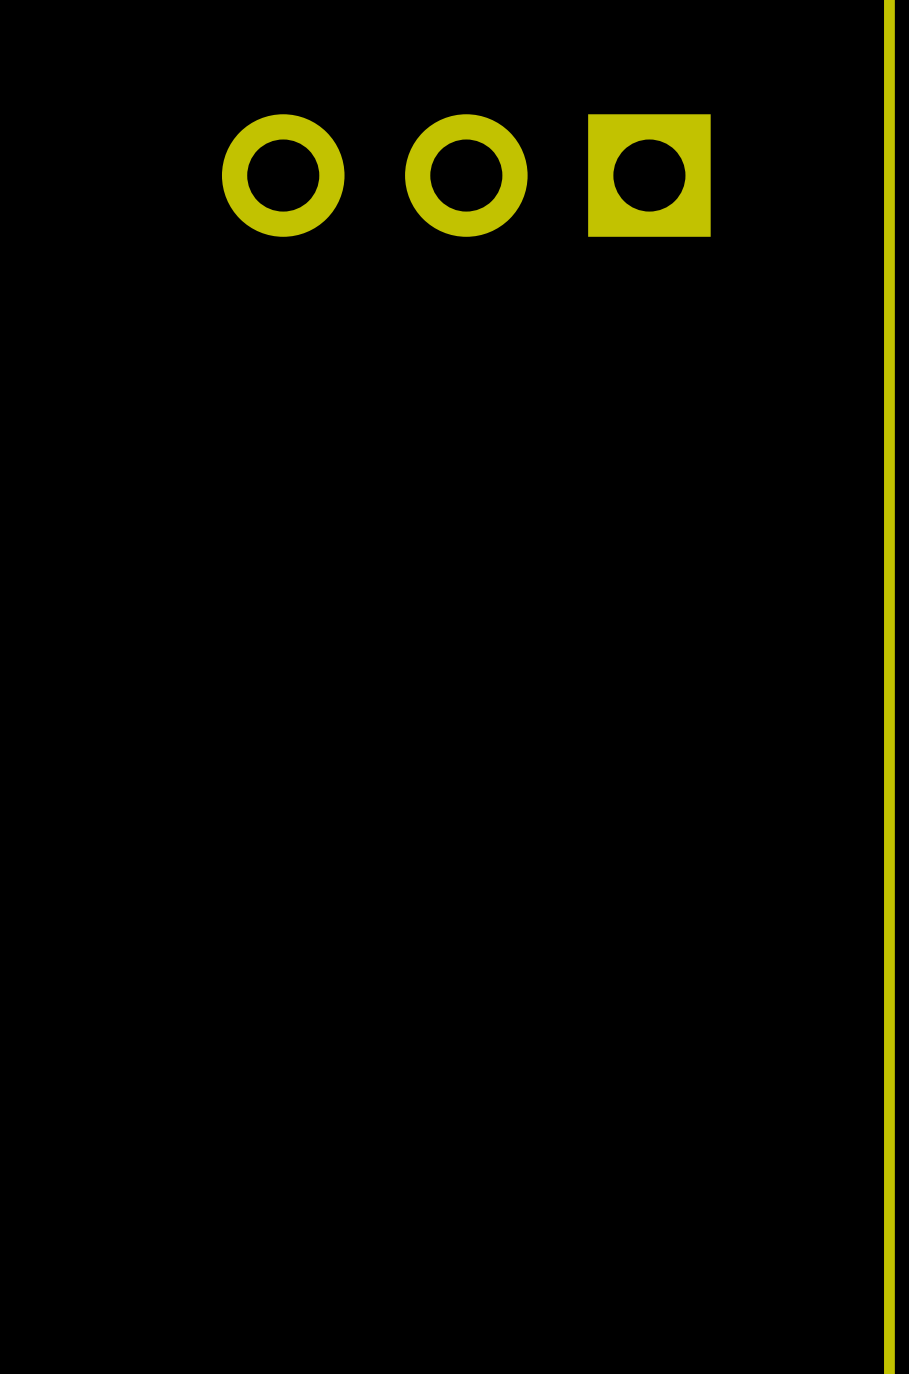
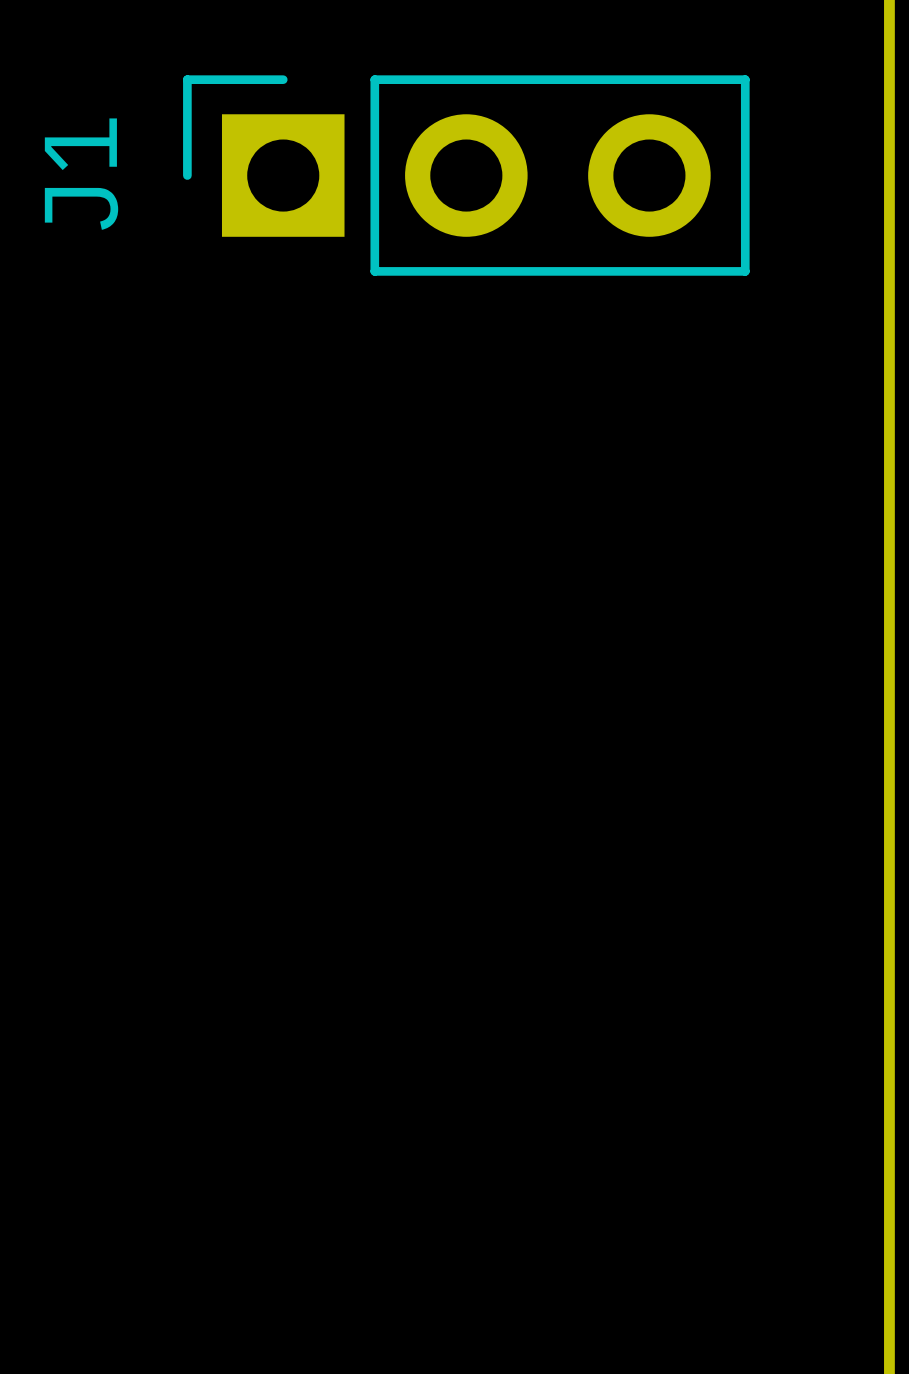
J1 side: bottom (466, 175) -> top (466, 175)

